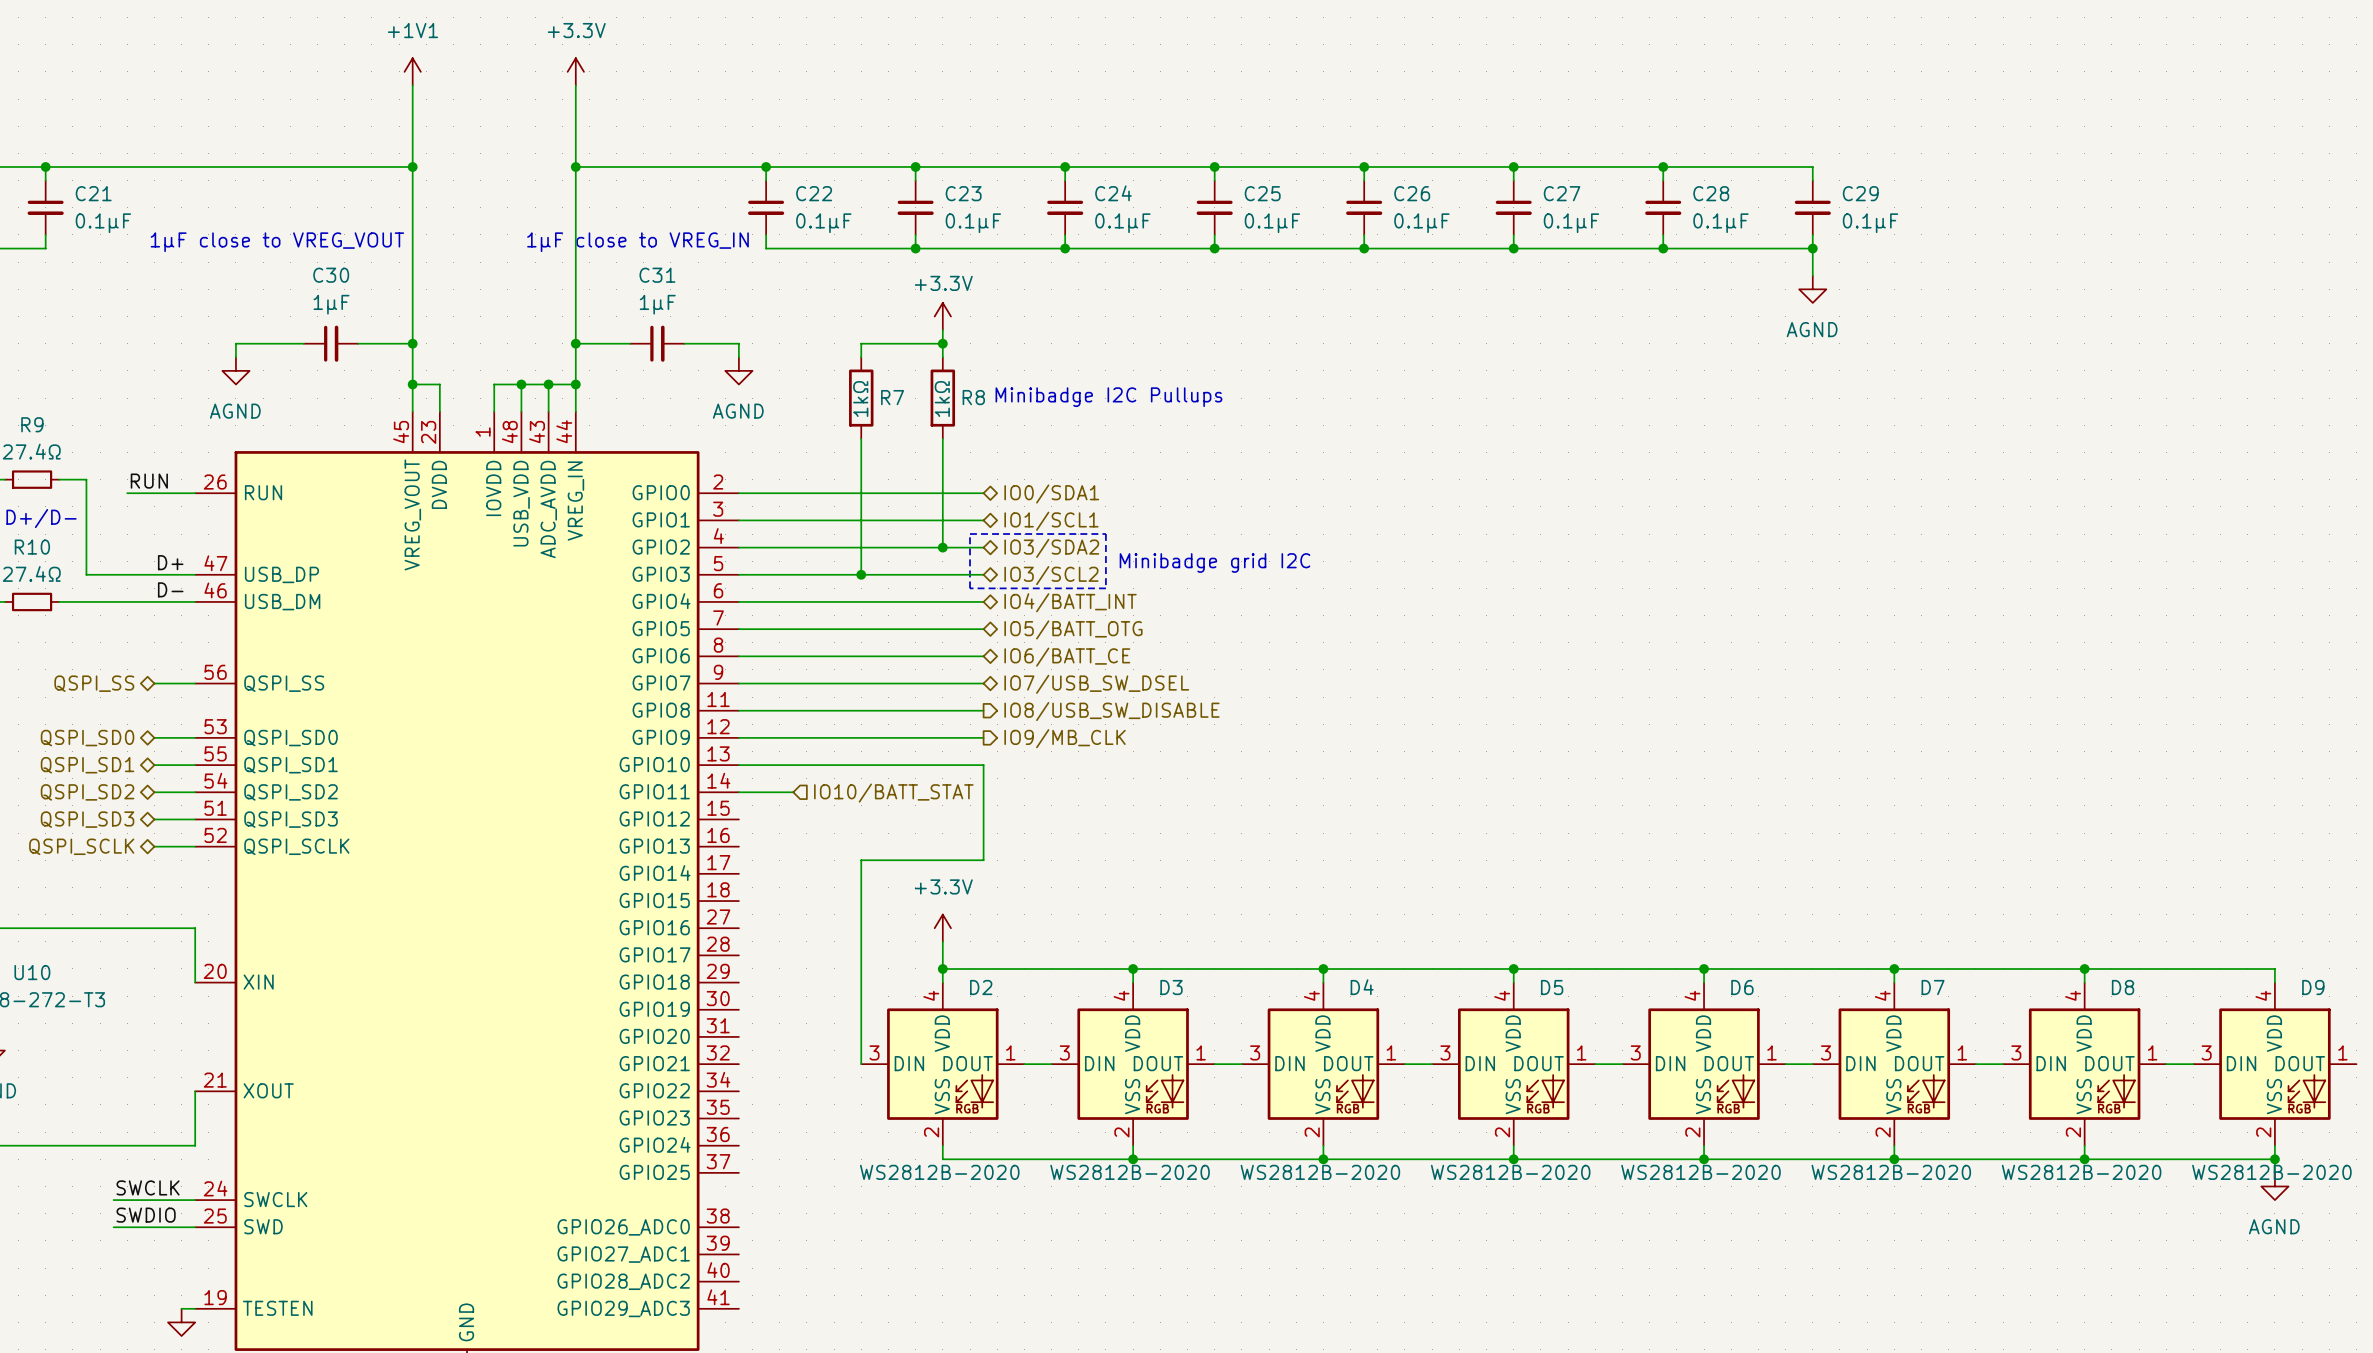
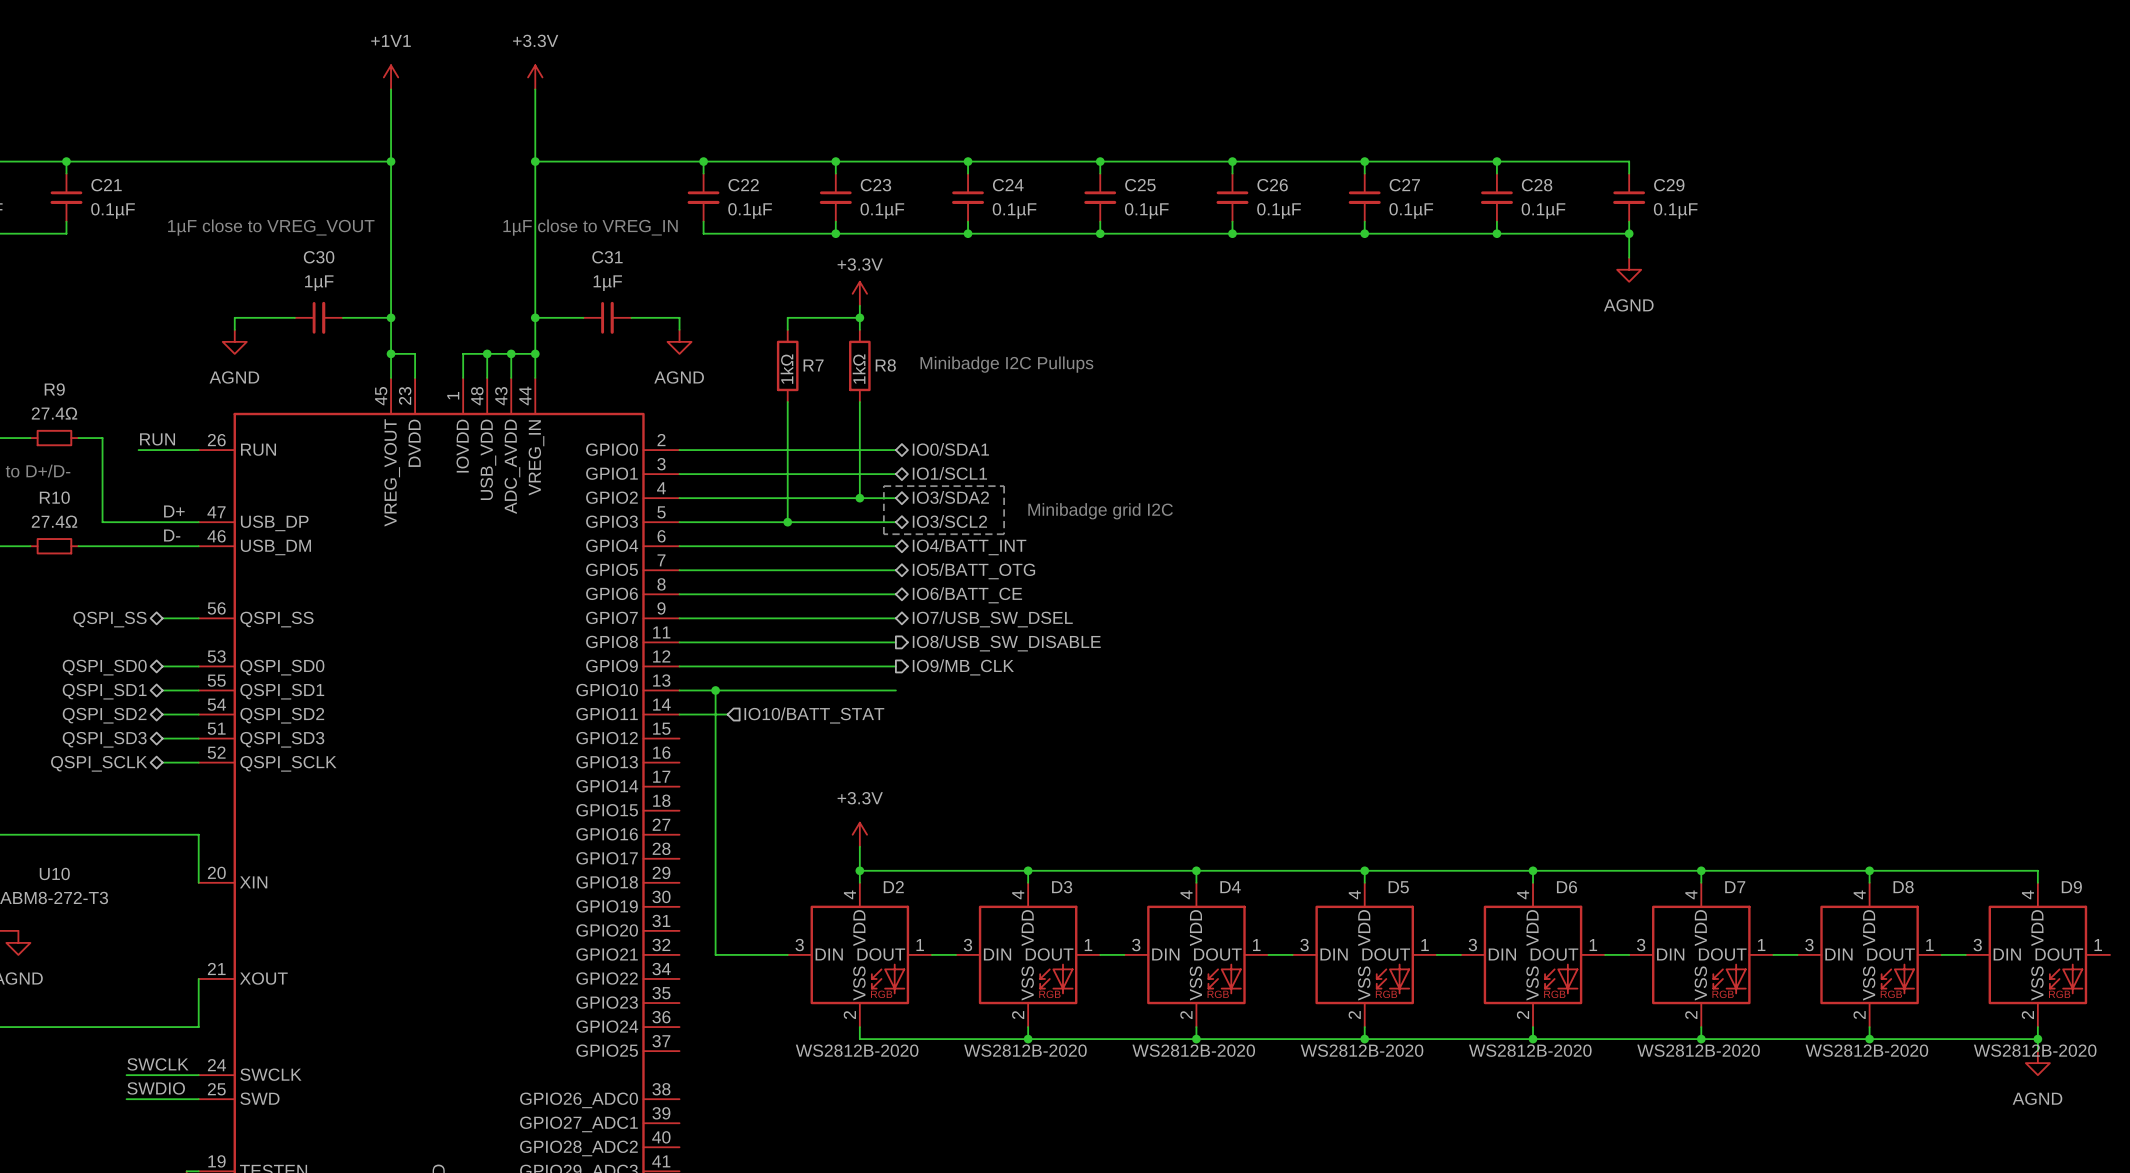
junction: none -> (715, 690)
wire: (983, 765) (983, 860) (861, 860) (861, 1064) -> (715, 690) (715, 954) (787, 954)

